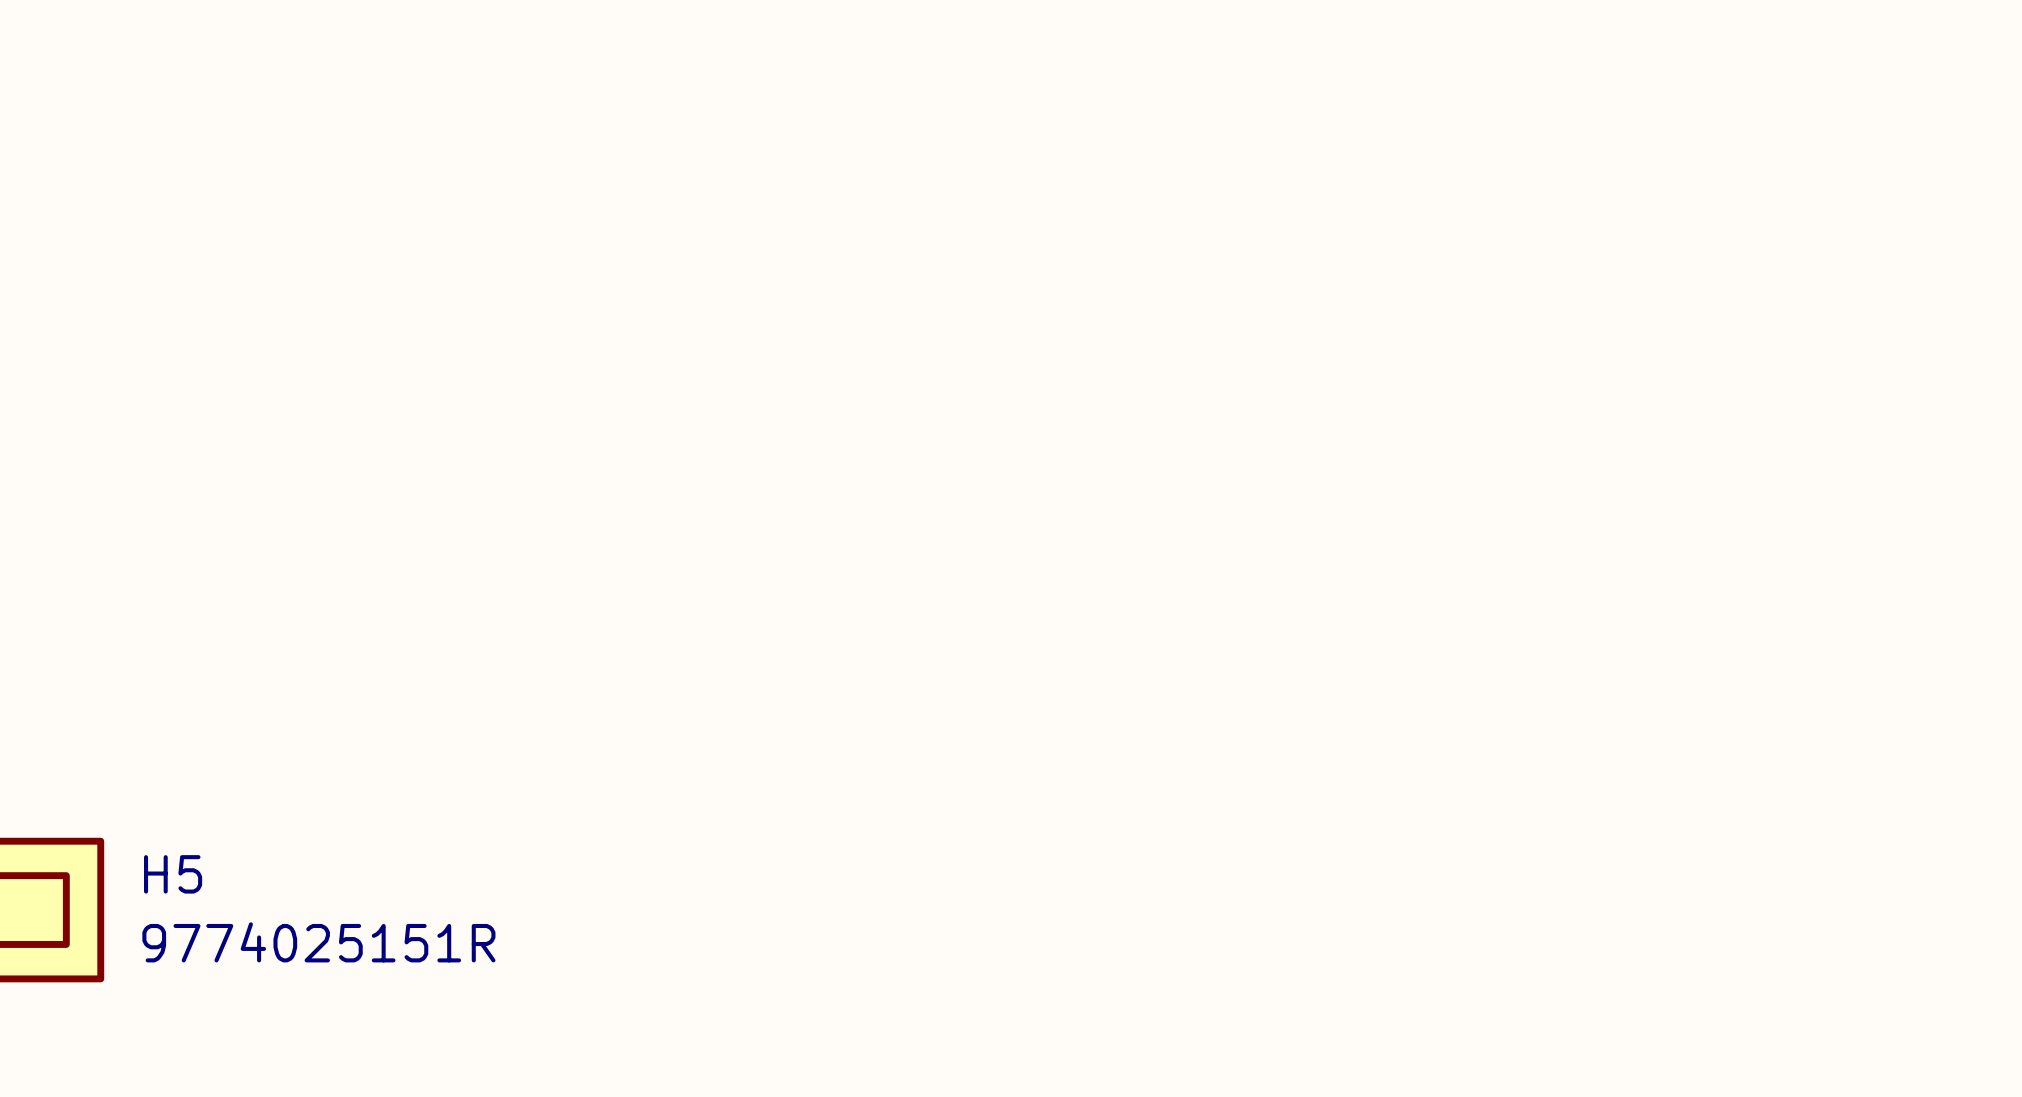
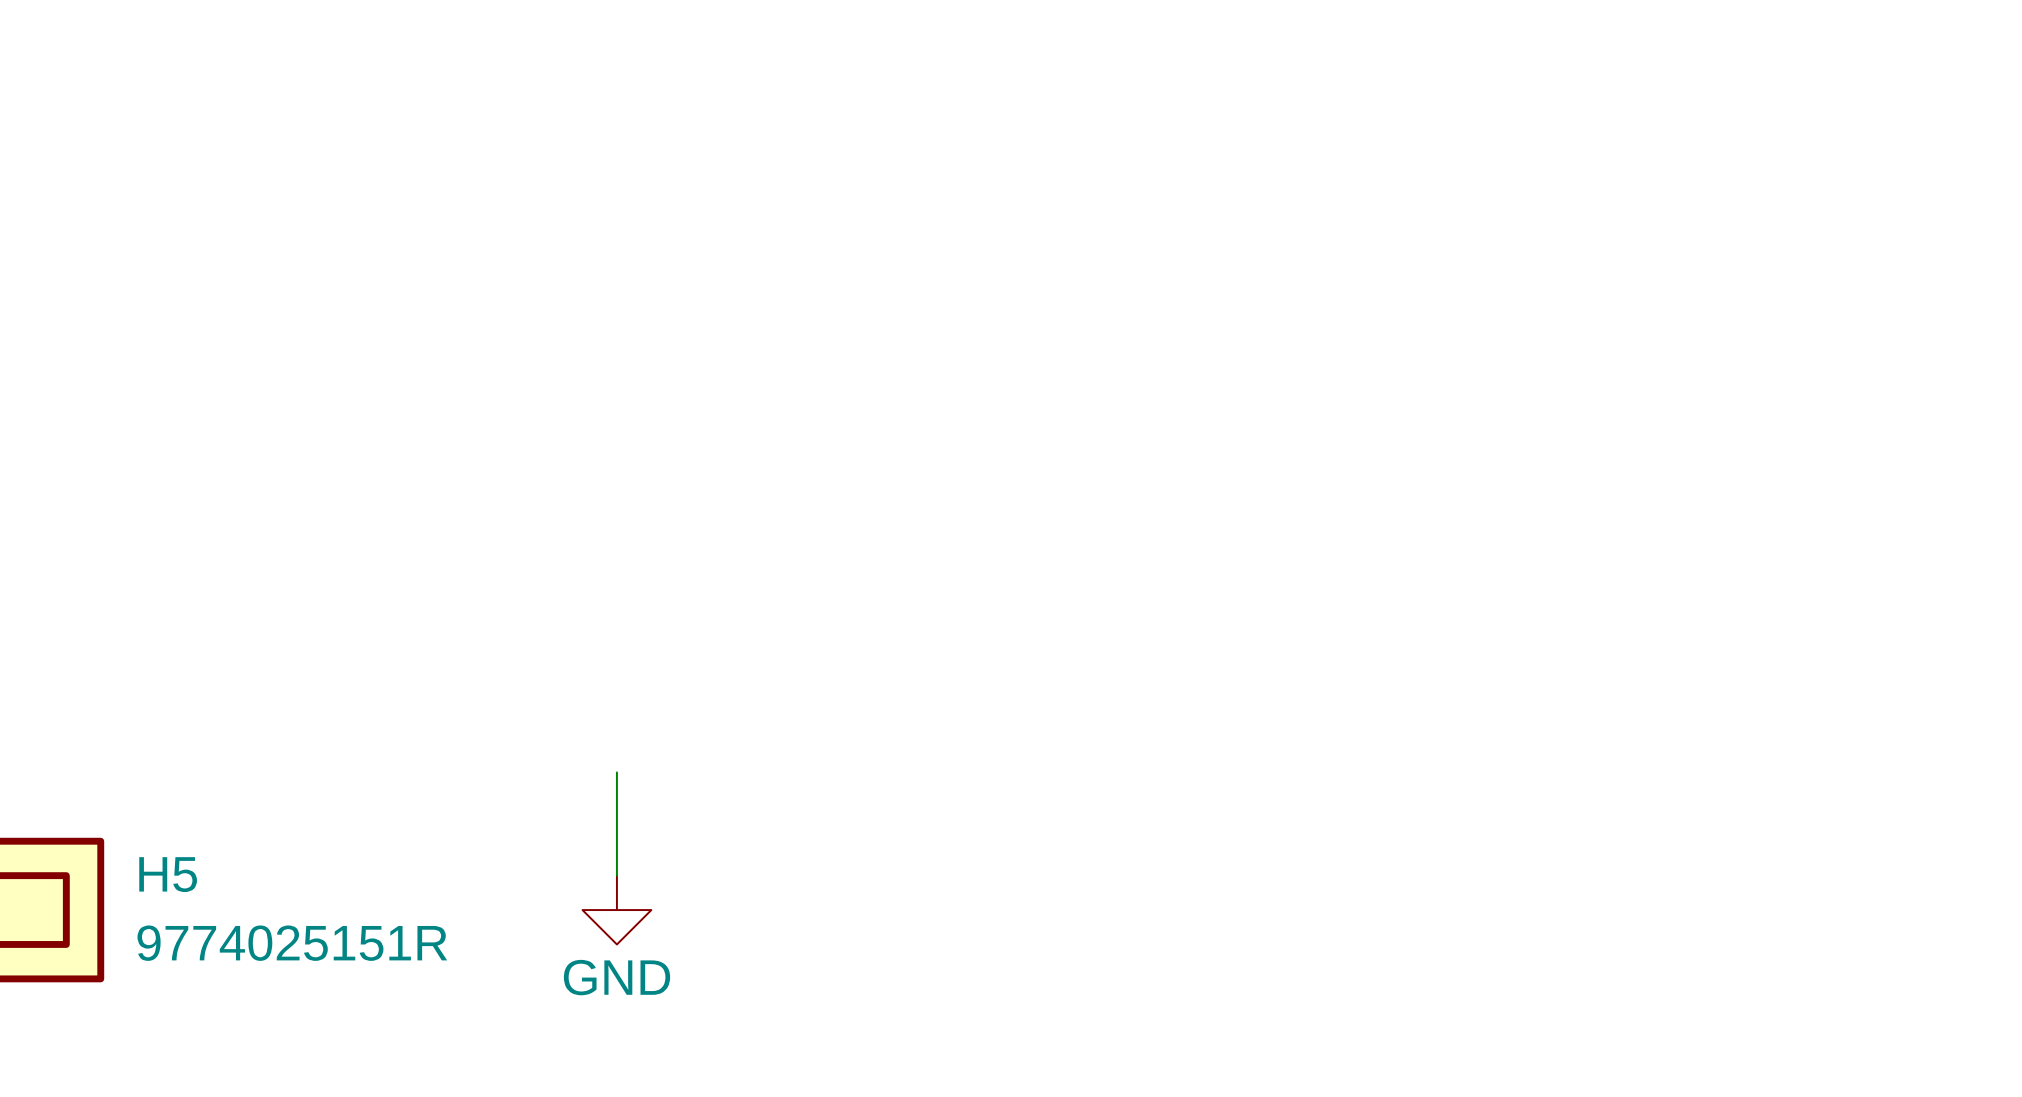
wire: none -> (616, 772) (616, 875)
power symbol: none -> GND (616, 910)

